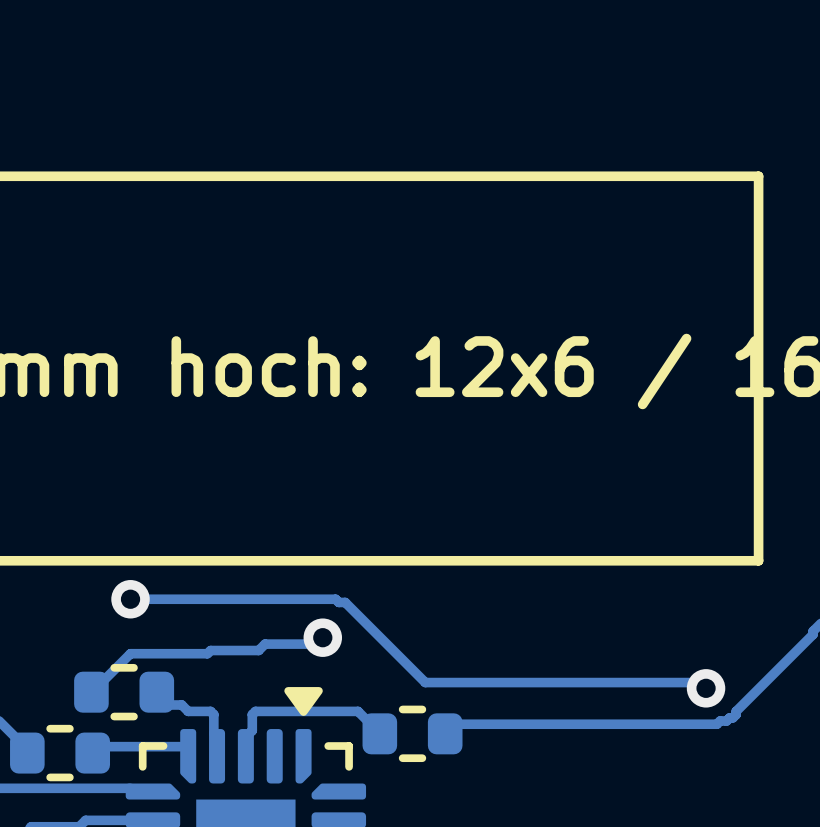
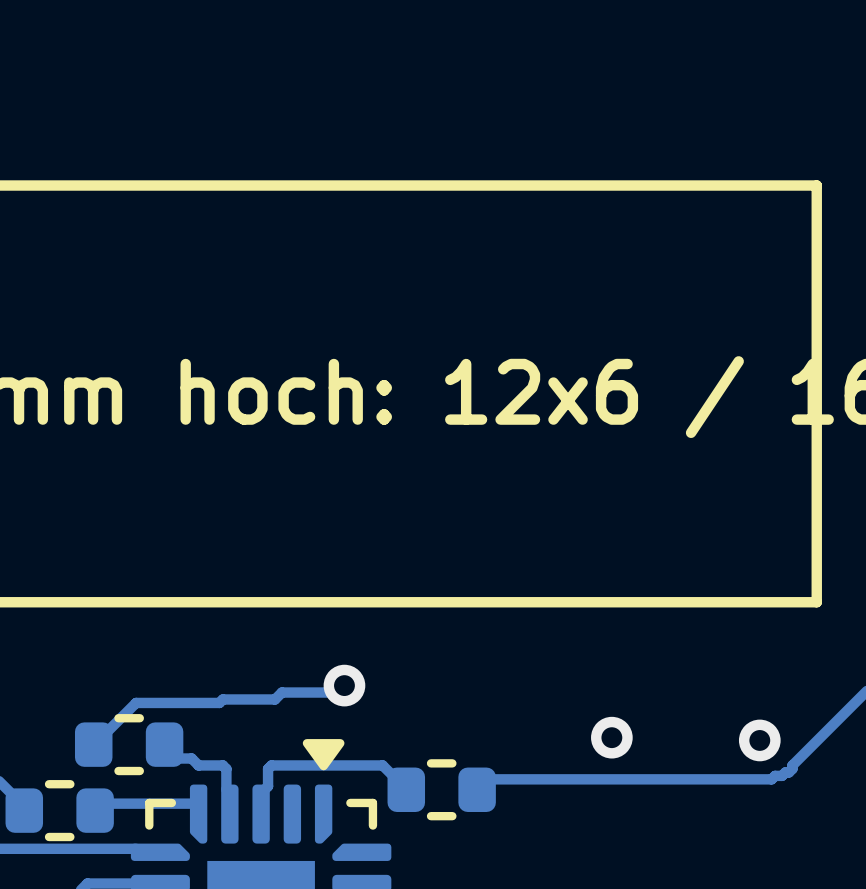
track: (130, 599) (335, 599) (338, 602) (345, 602) (425, 682) (691, 682) -> none
via: (130, 599) -> none
via: none -> (611, 737)

